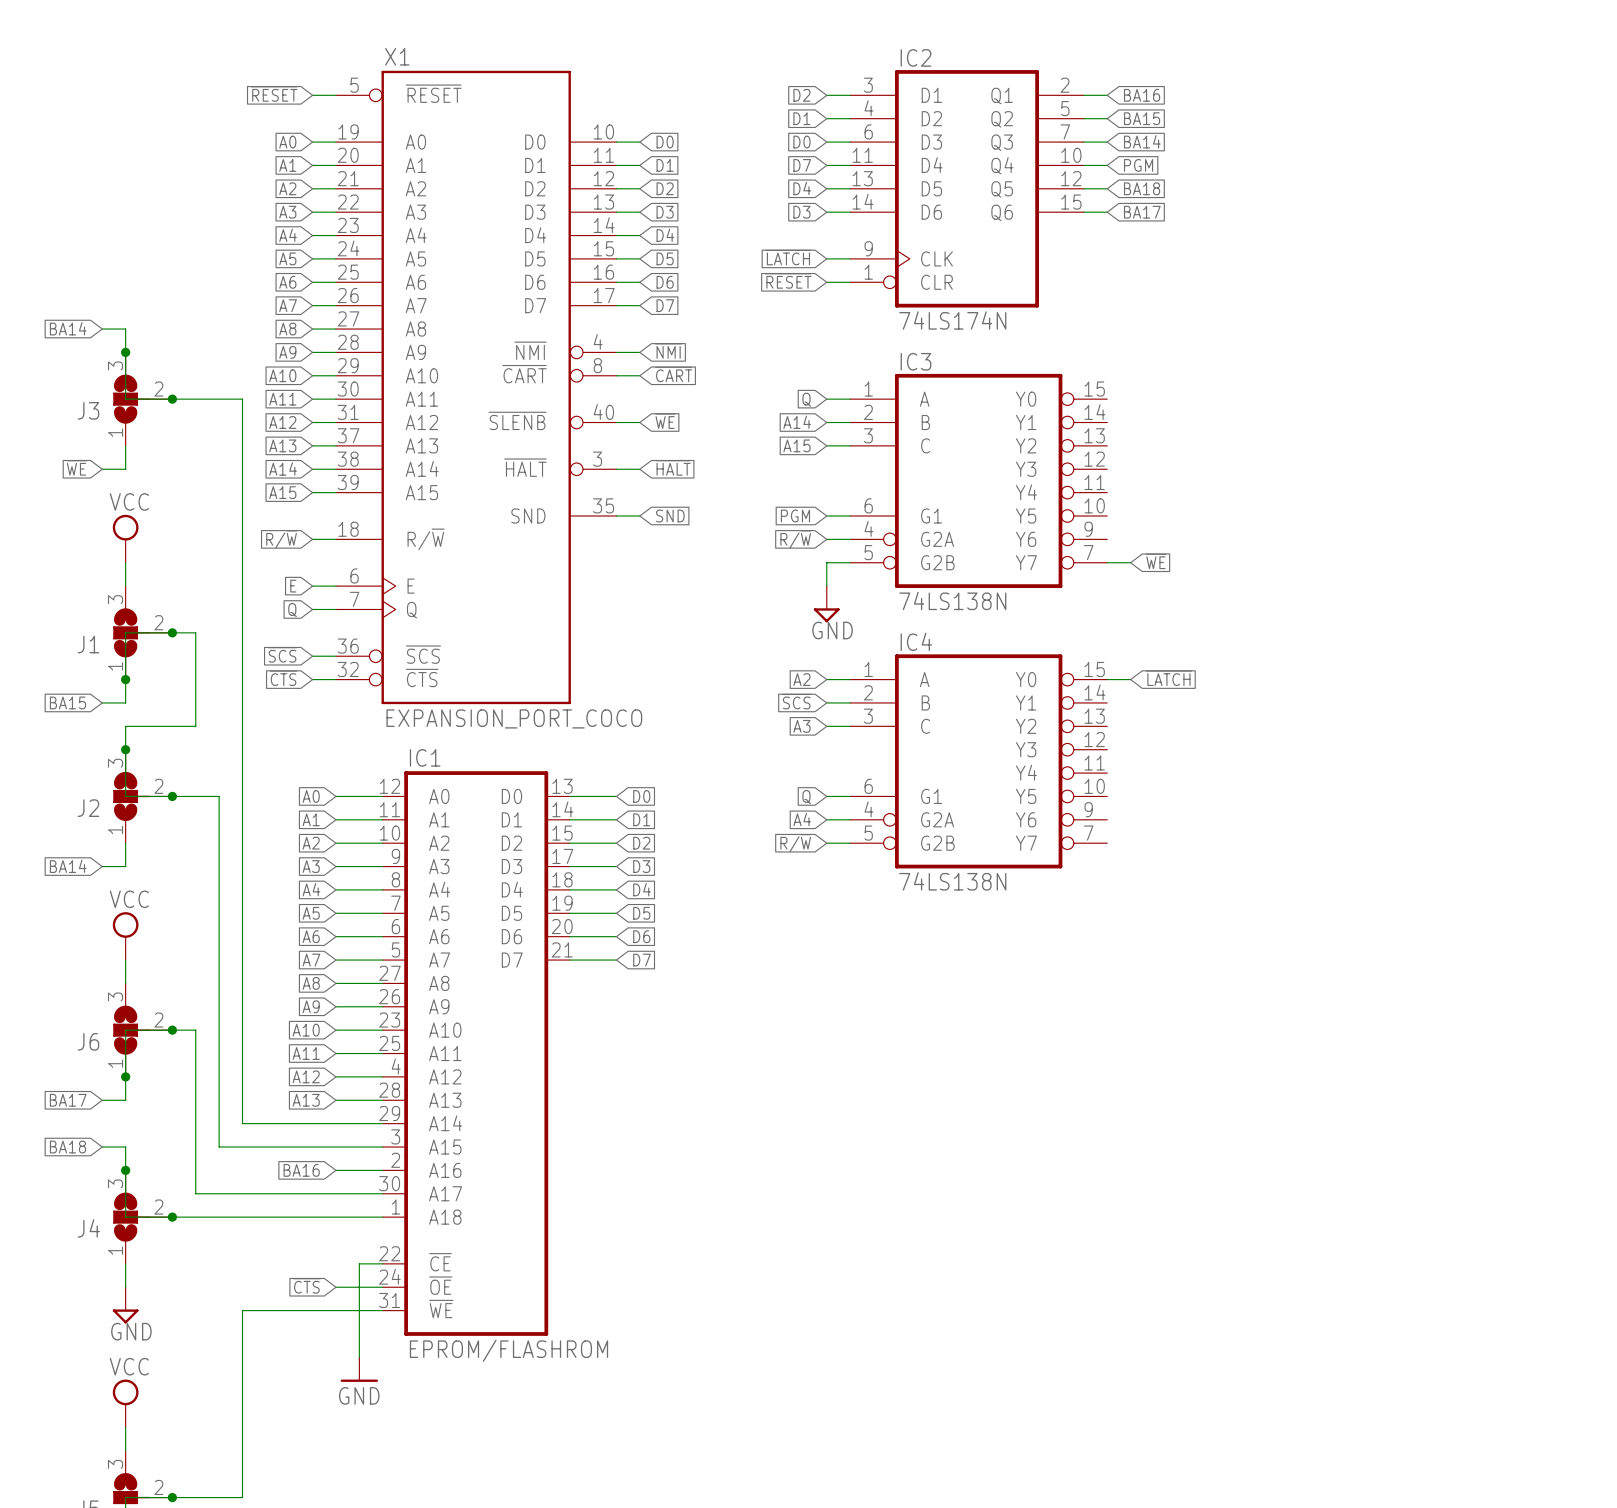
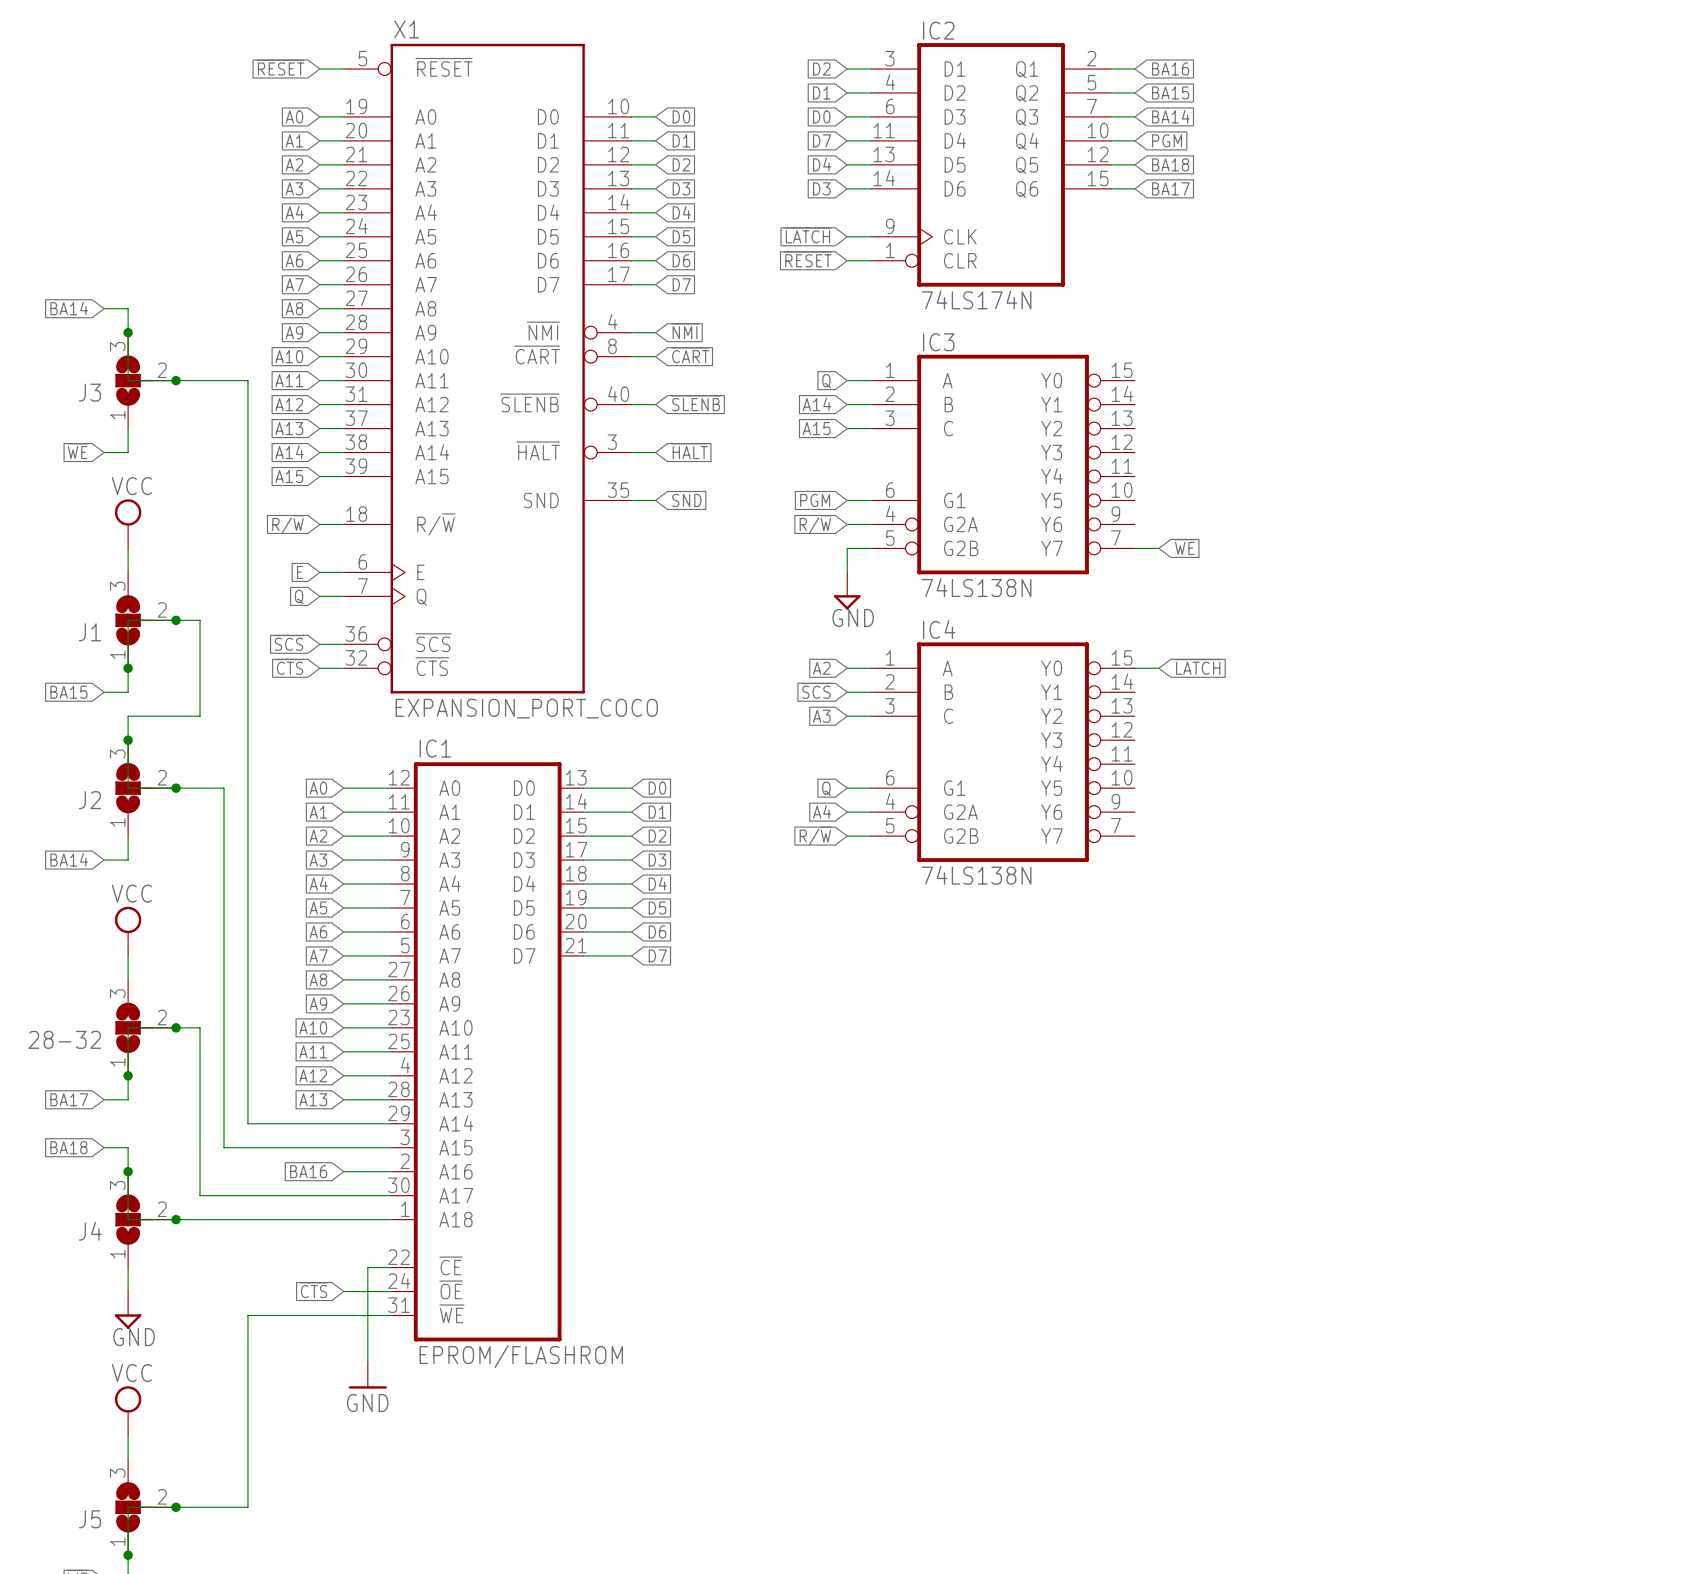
global label: ~{WE} (665, 421) -> ~{SLENB} (696, 403)
J6 name: J6 (88, 1041) -> 28-32 (64, 1039)

